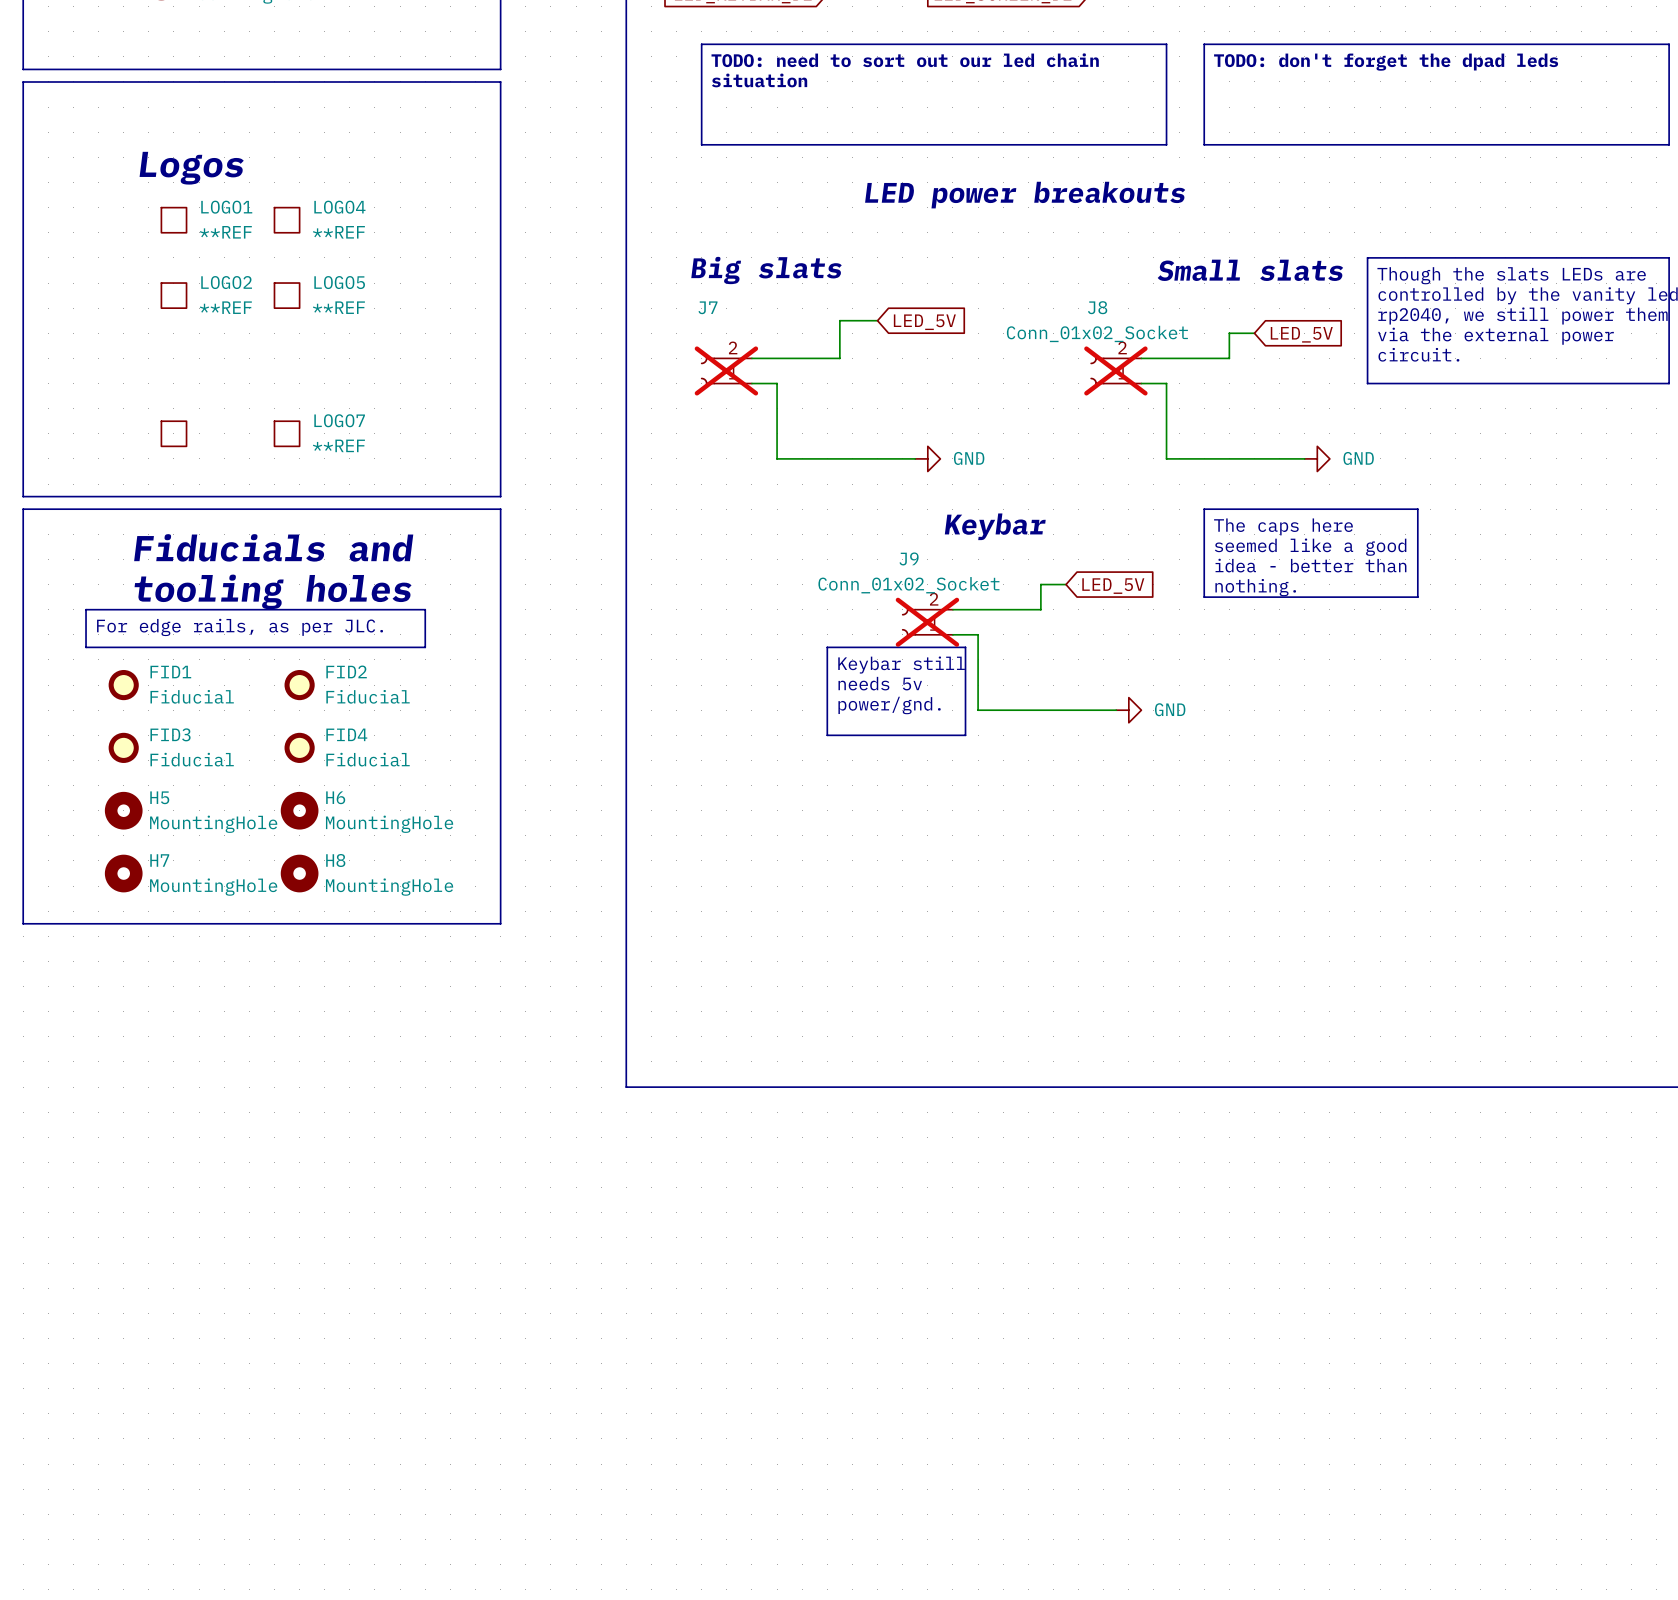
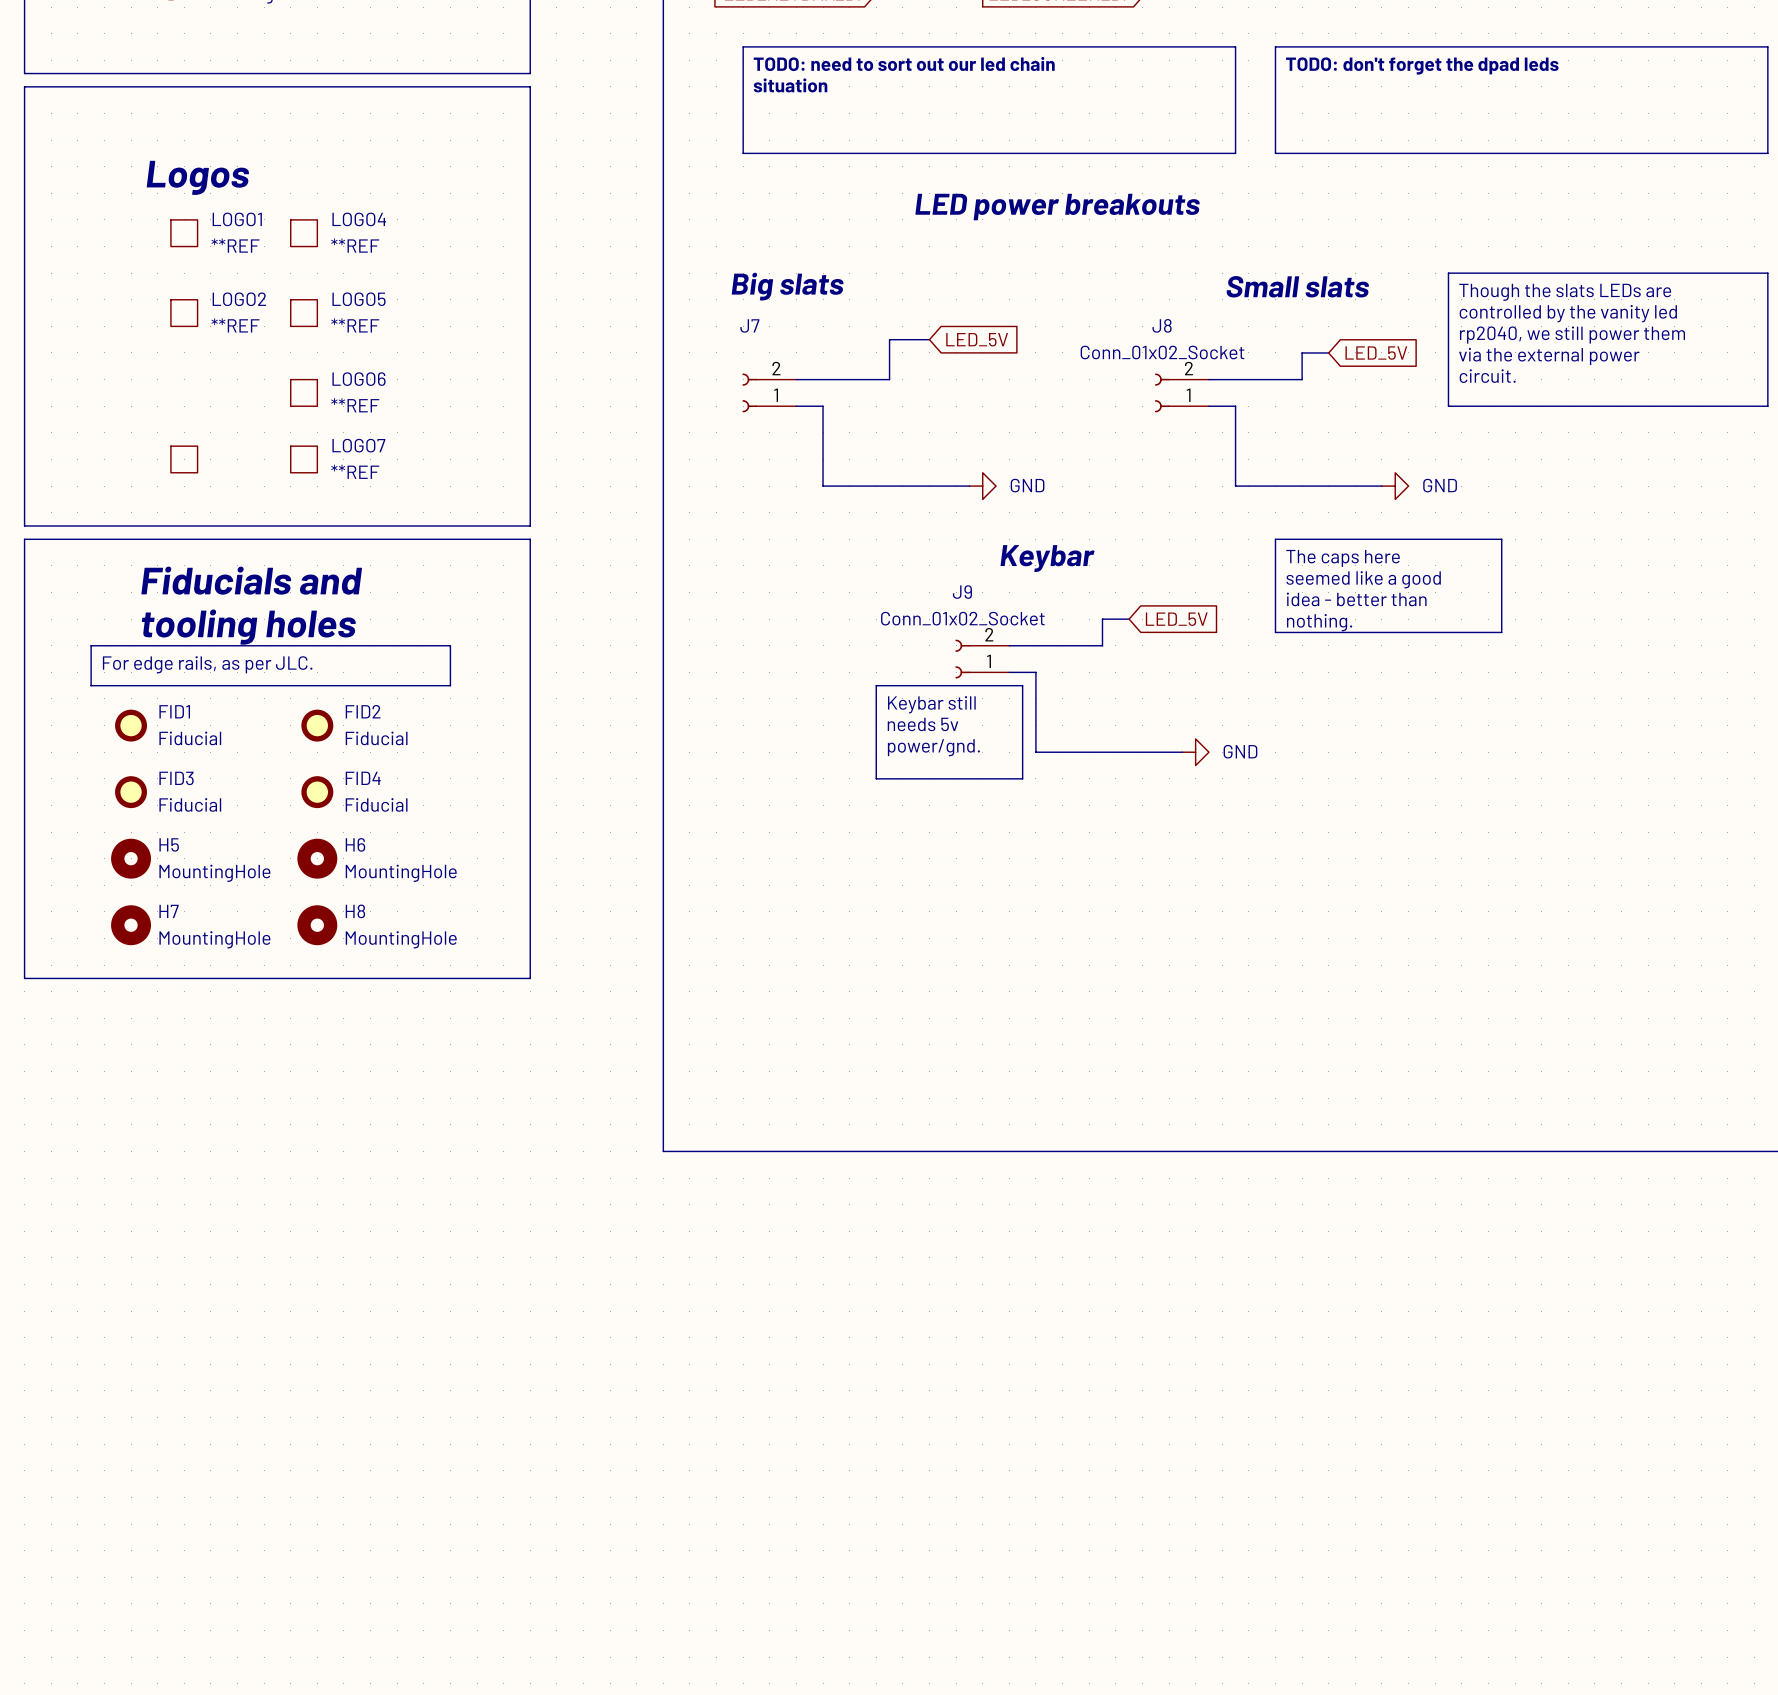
LOGO6: none -> **REF (304, 392)
J7 do-not-place cross: (726, 370) -> none
J8 do-not-place cross: (1115, 370) -> none
J9 do-not-place cross: (927, 622) -> none

